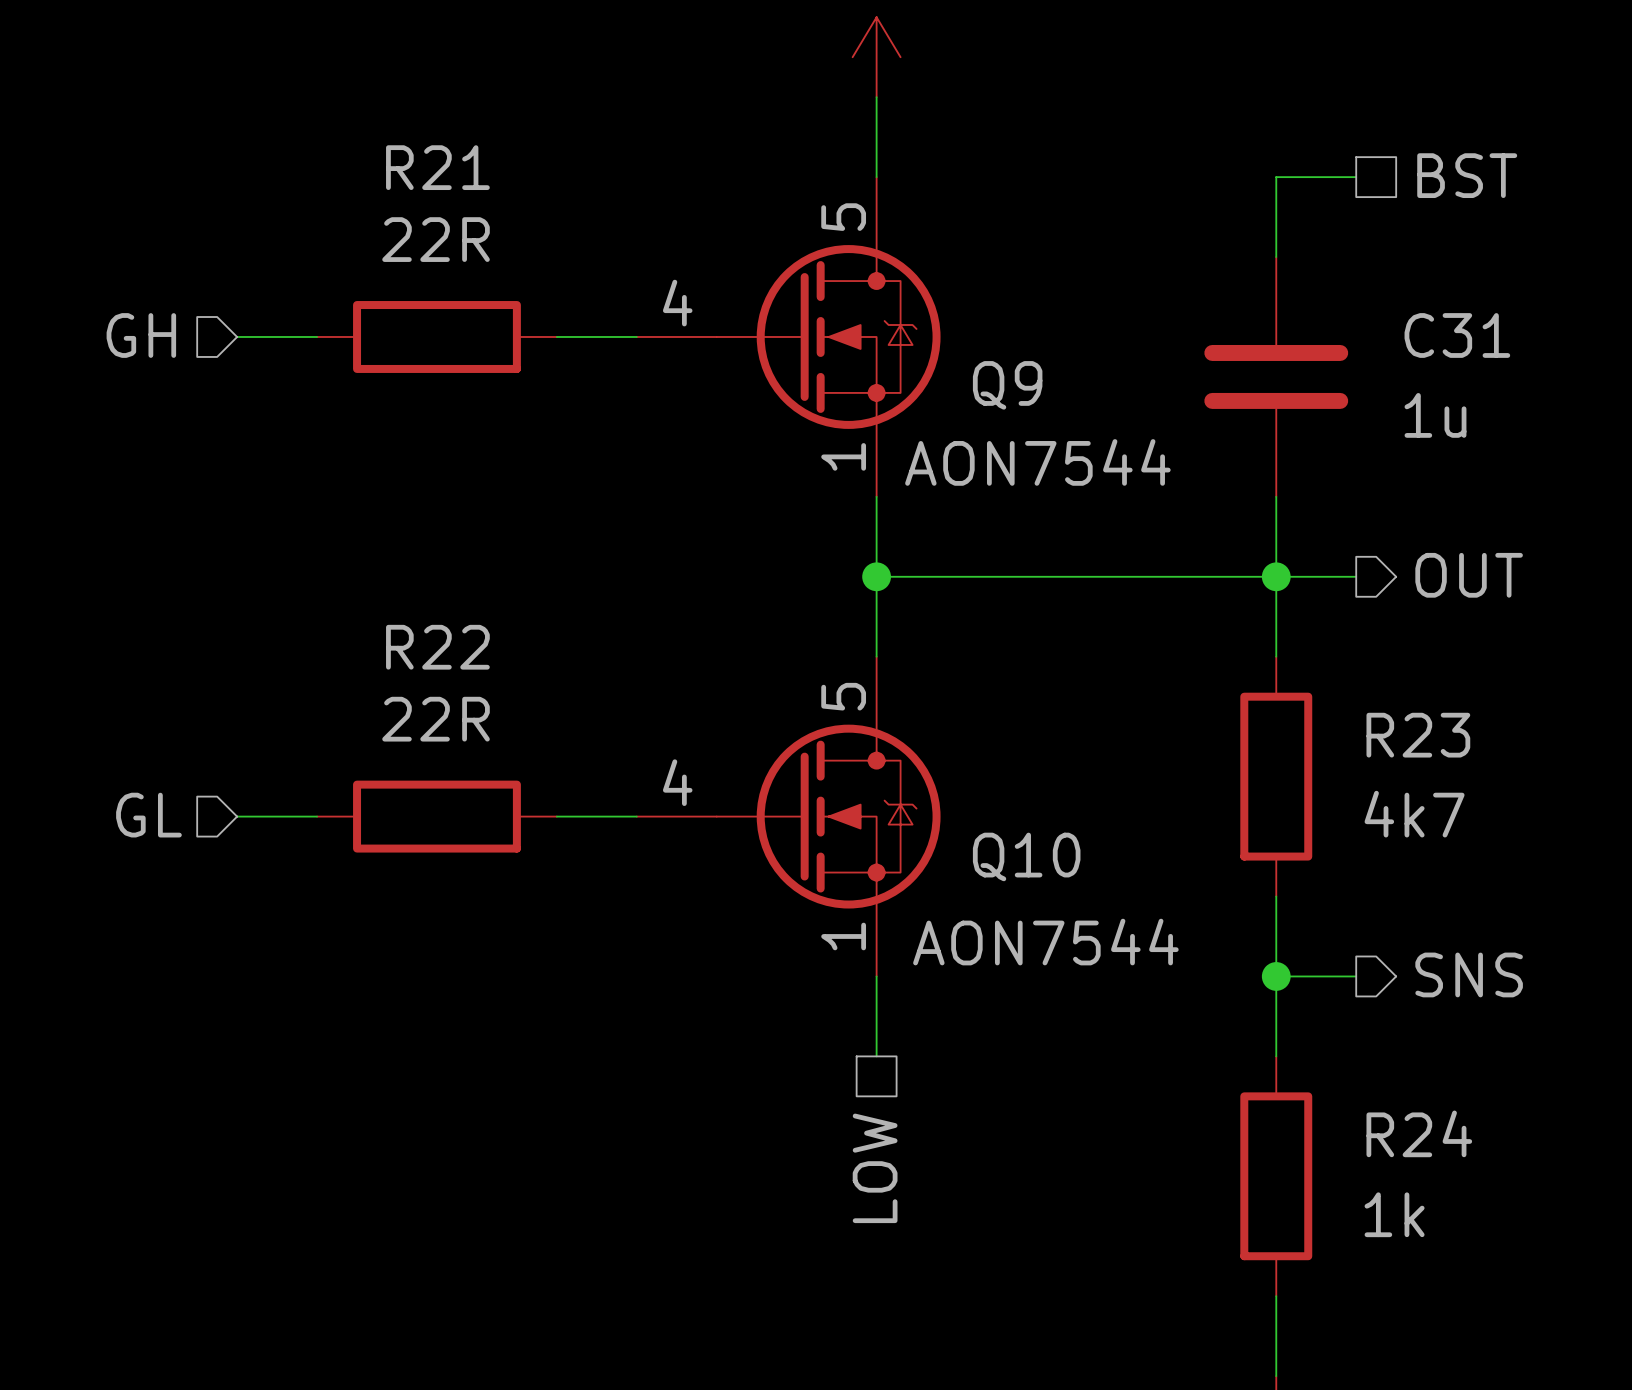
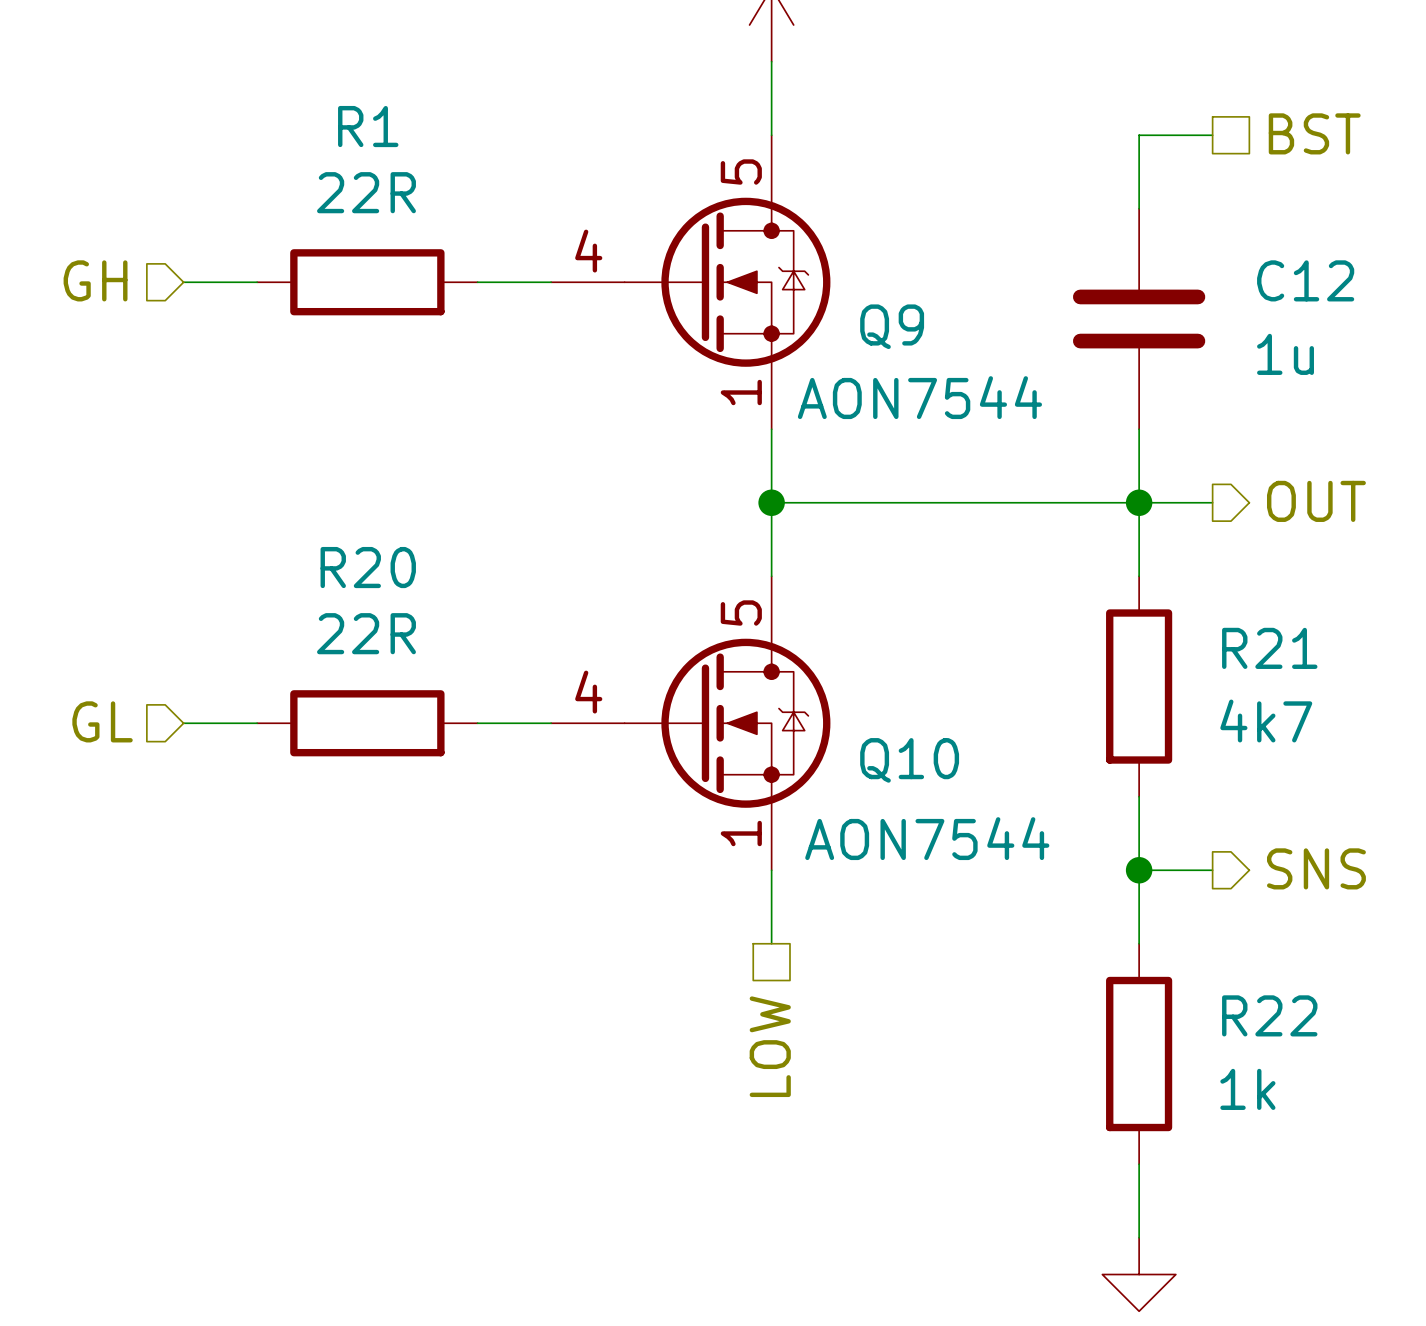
R21 name: R21 (437, 167) -> R1 (368, 126)
C31 name: C31 (1457, 335) -> C12 (1305, 280)
R22 name: R22 (437, 647) -> R20 (368, 567)
R23 name: R23 (1418, 735) -> R21 (1269, 648)
R24 name: R24 (1419, 1133) -> R22 (1269, 1015)

